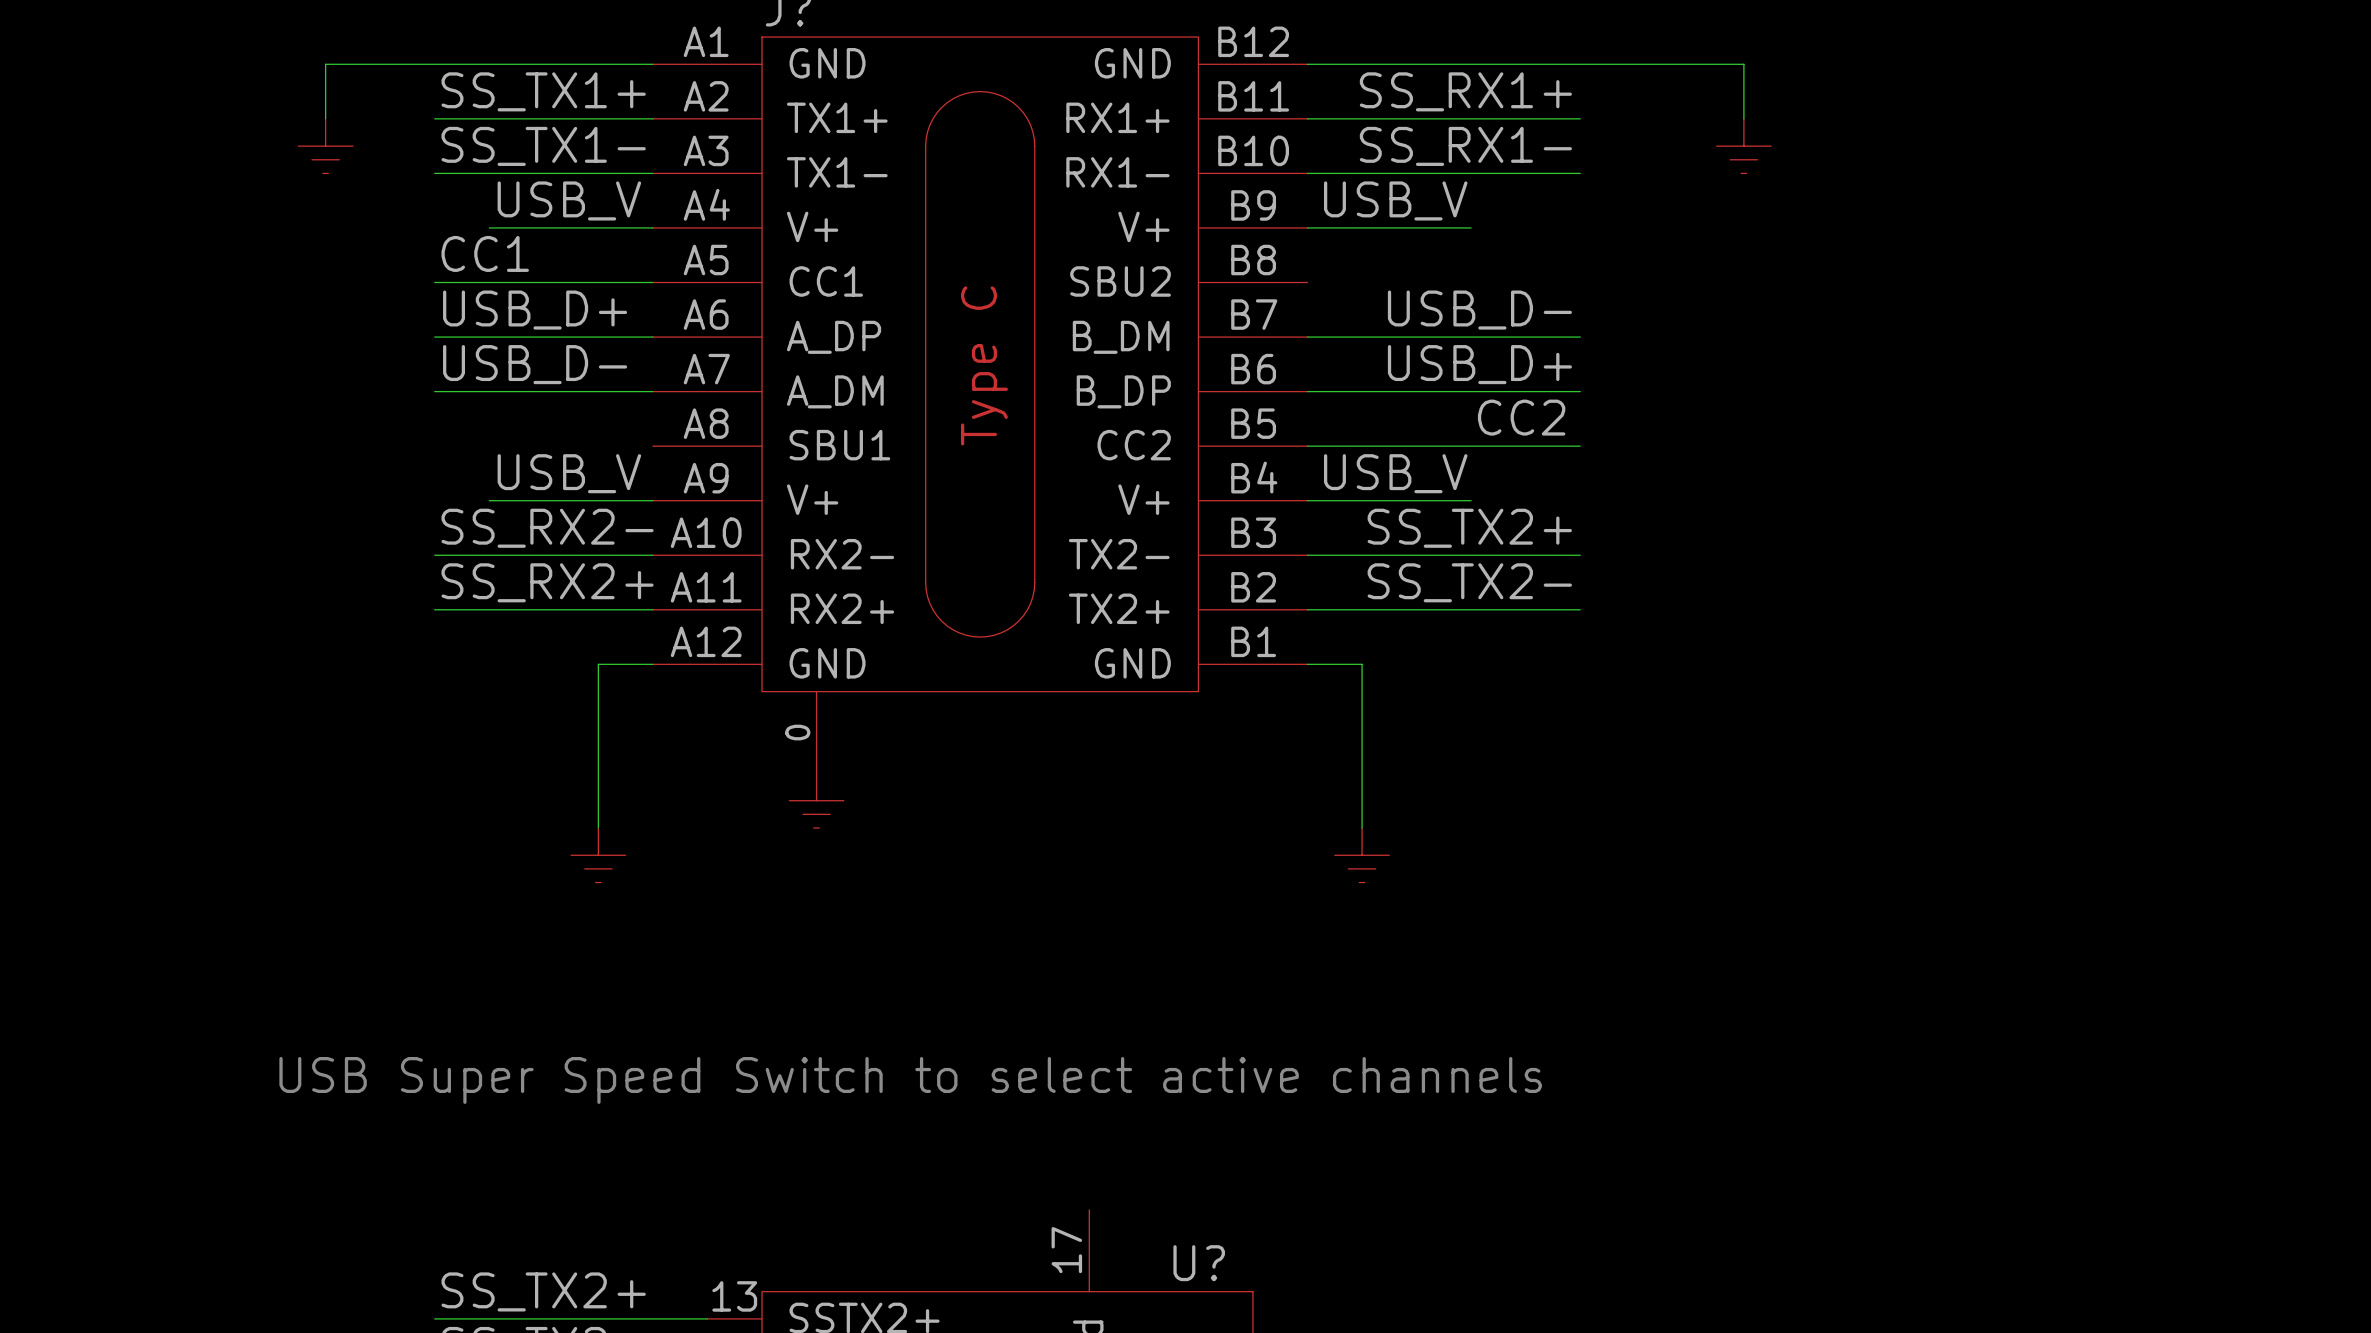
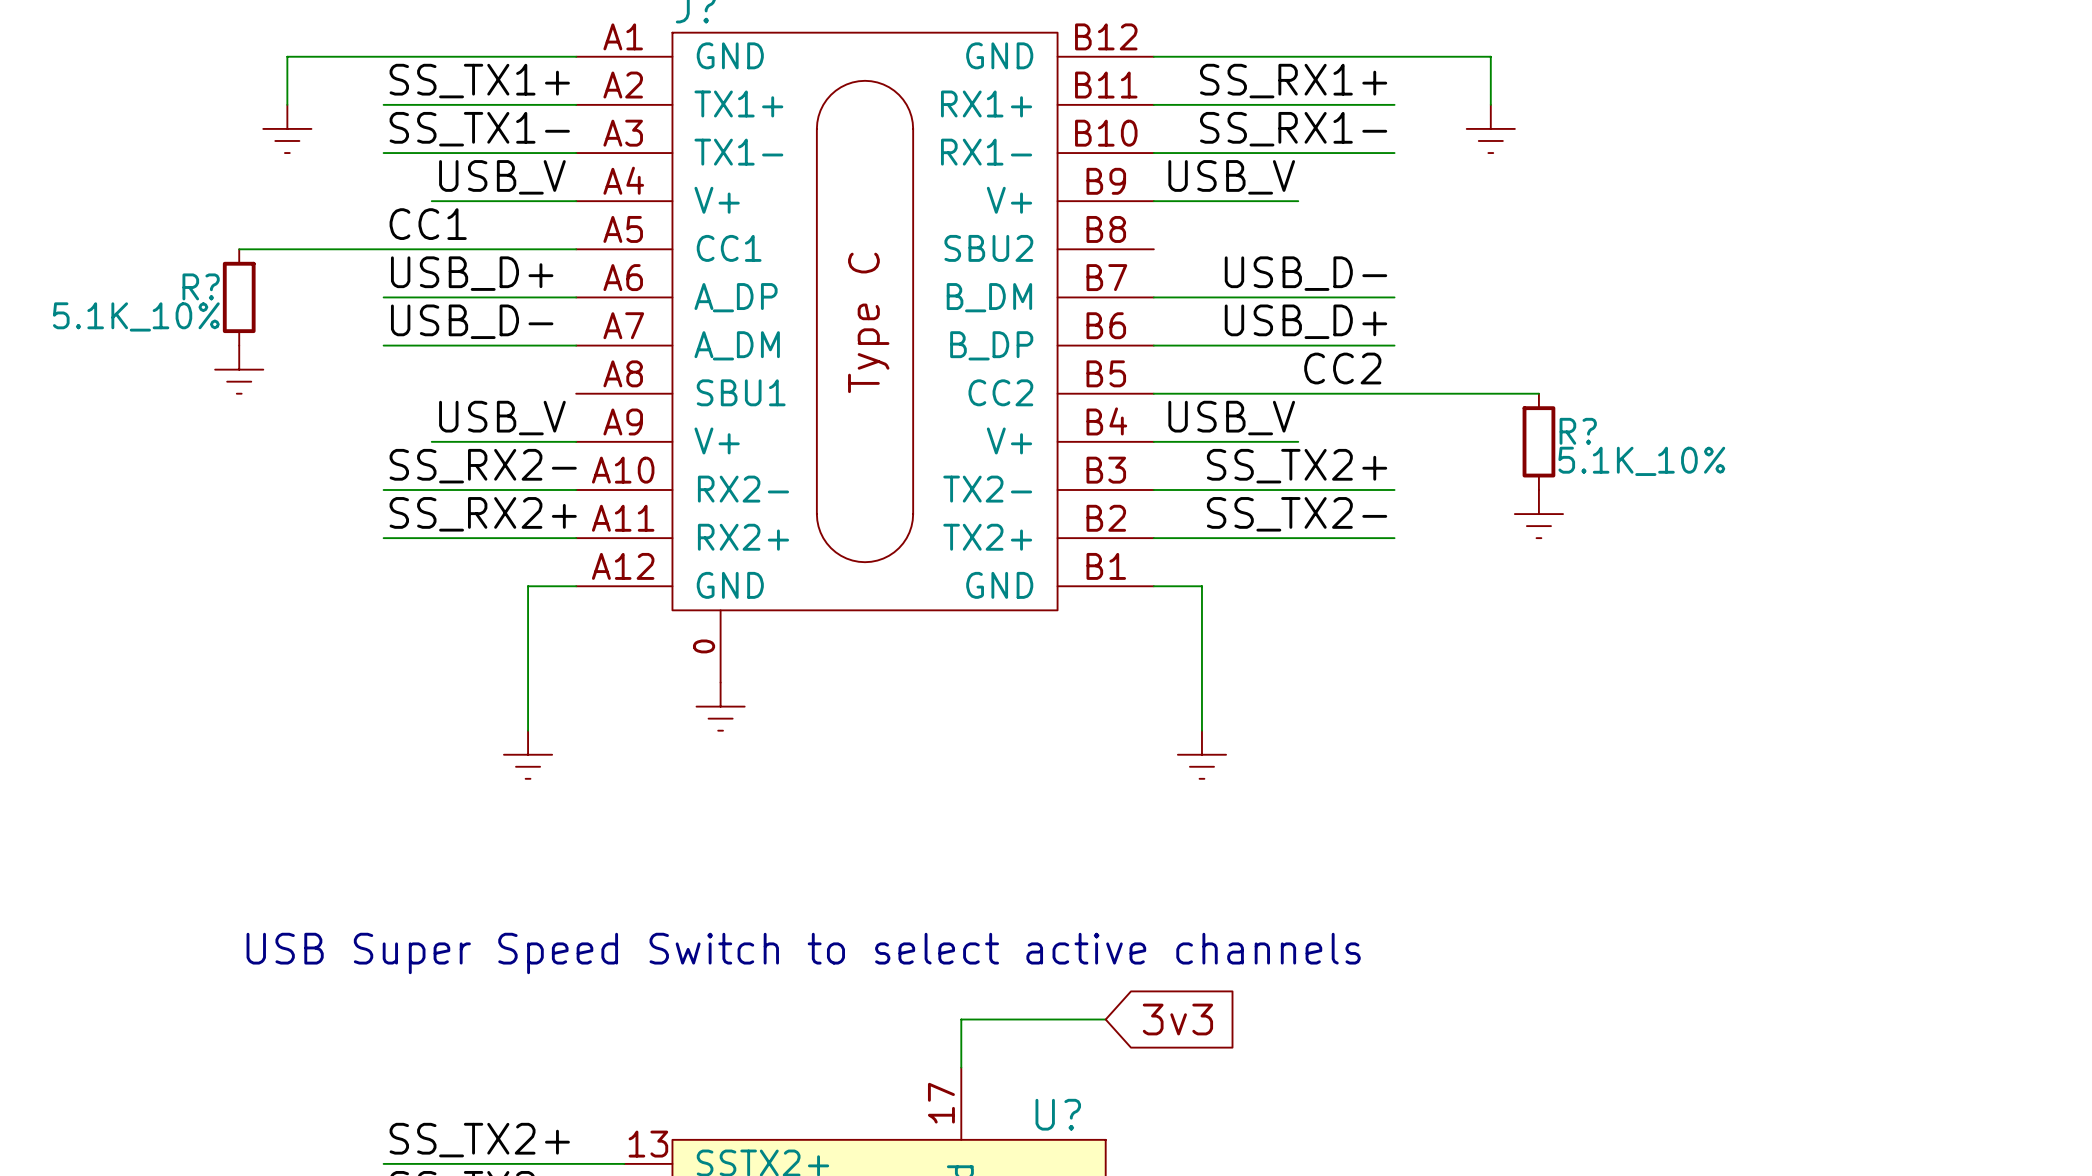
wire: (1689, 64) (1743, 64) (1743, 118) -> (1490, 56) (1490, 104)
power symbol position: (1743, 146) -> (1490, 128)
wire: none -> (239, 249) (383, 249)
R?: none -> 5.1K_10% (239, 297)
power symbol: none -> (239, 369)
wire: none -> (1394, 393) (1538, 393)
R?: none -> 5.1K_10% (1538, 441)
power symbol: none -> (1538, 514)
wire: none -> (1105, 1019) (961, 1019) (961, 1067)
global label: none -> 3v3 (1177, 1019)

